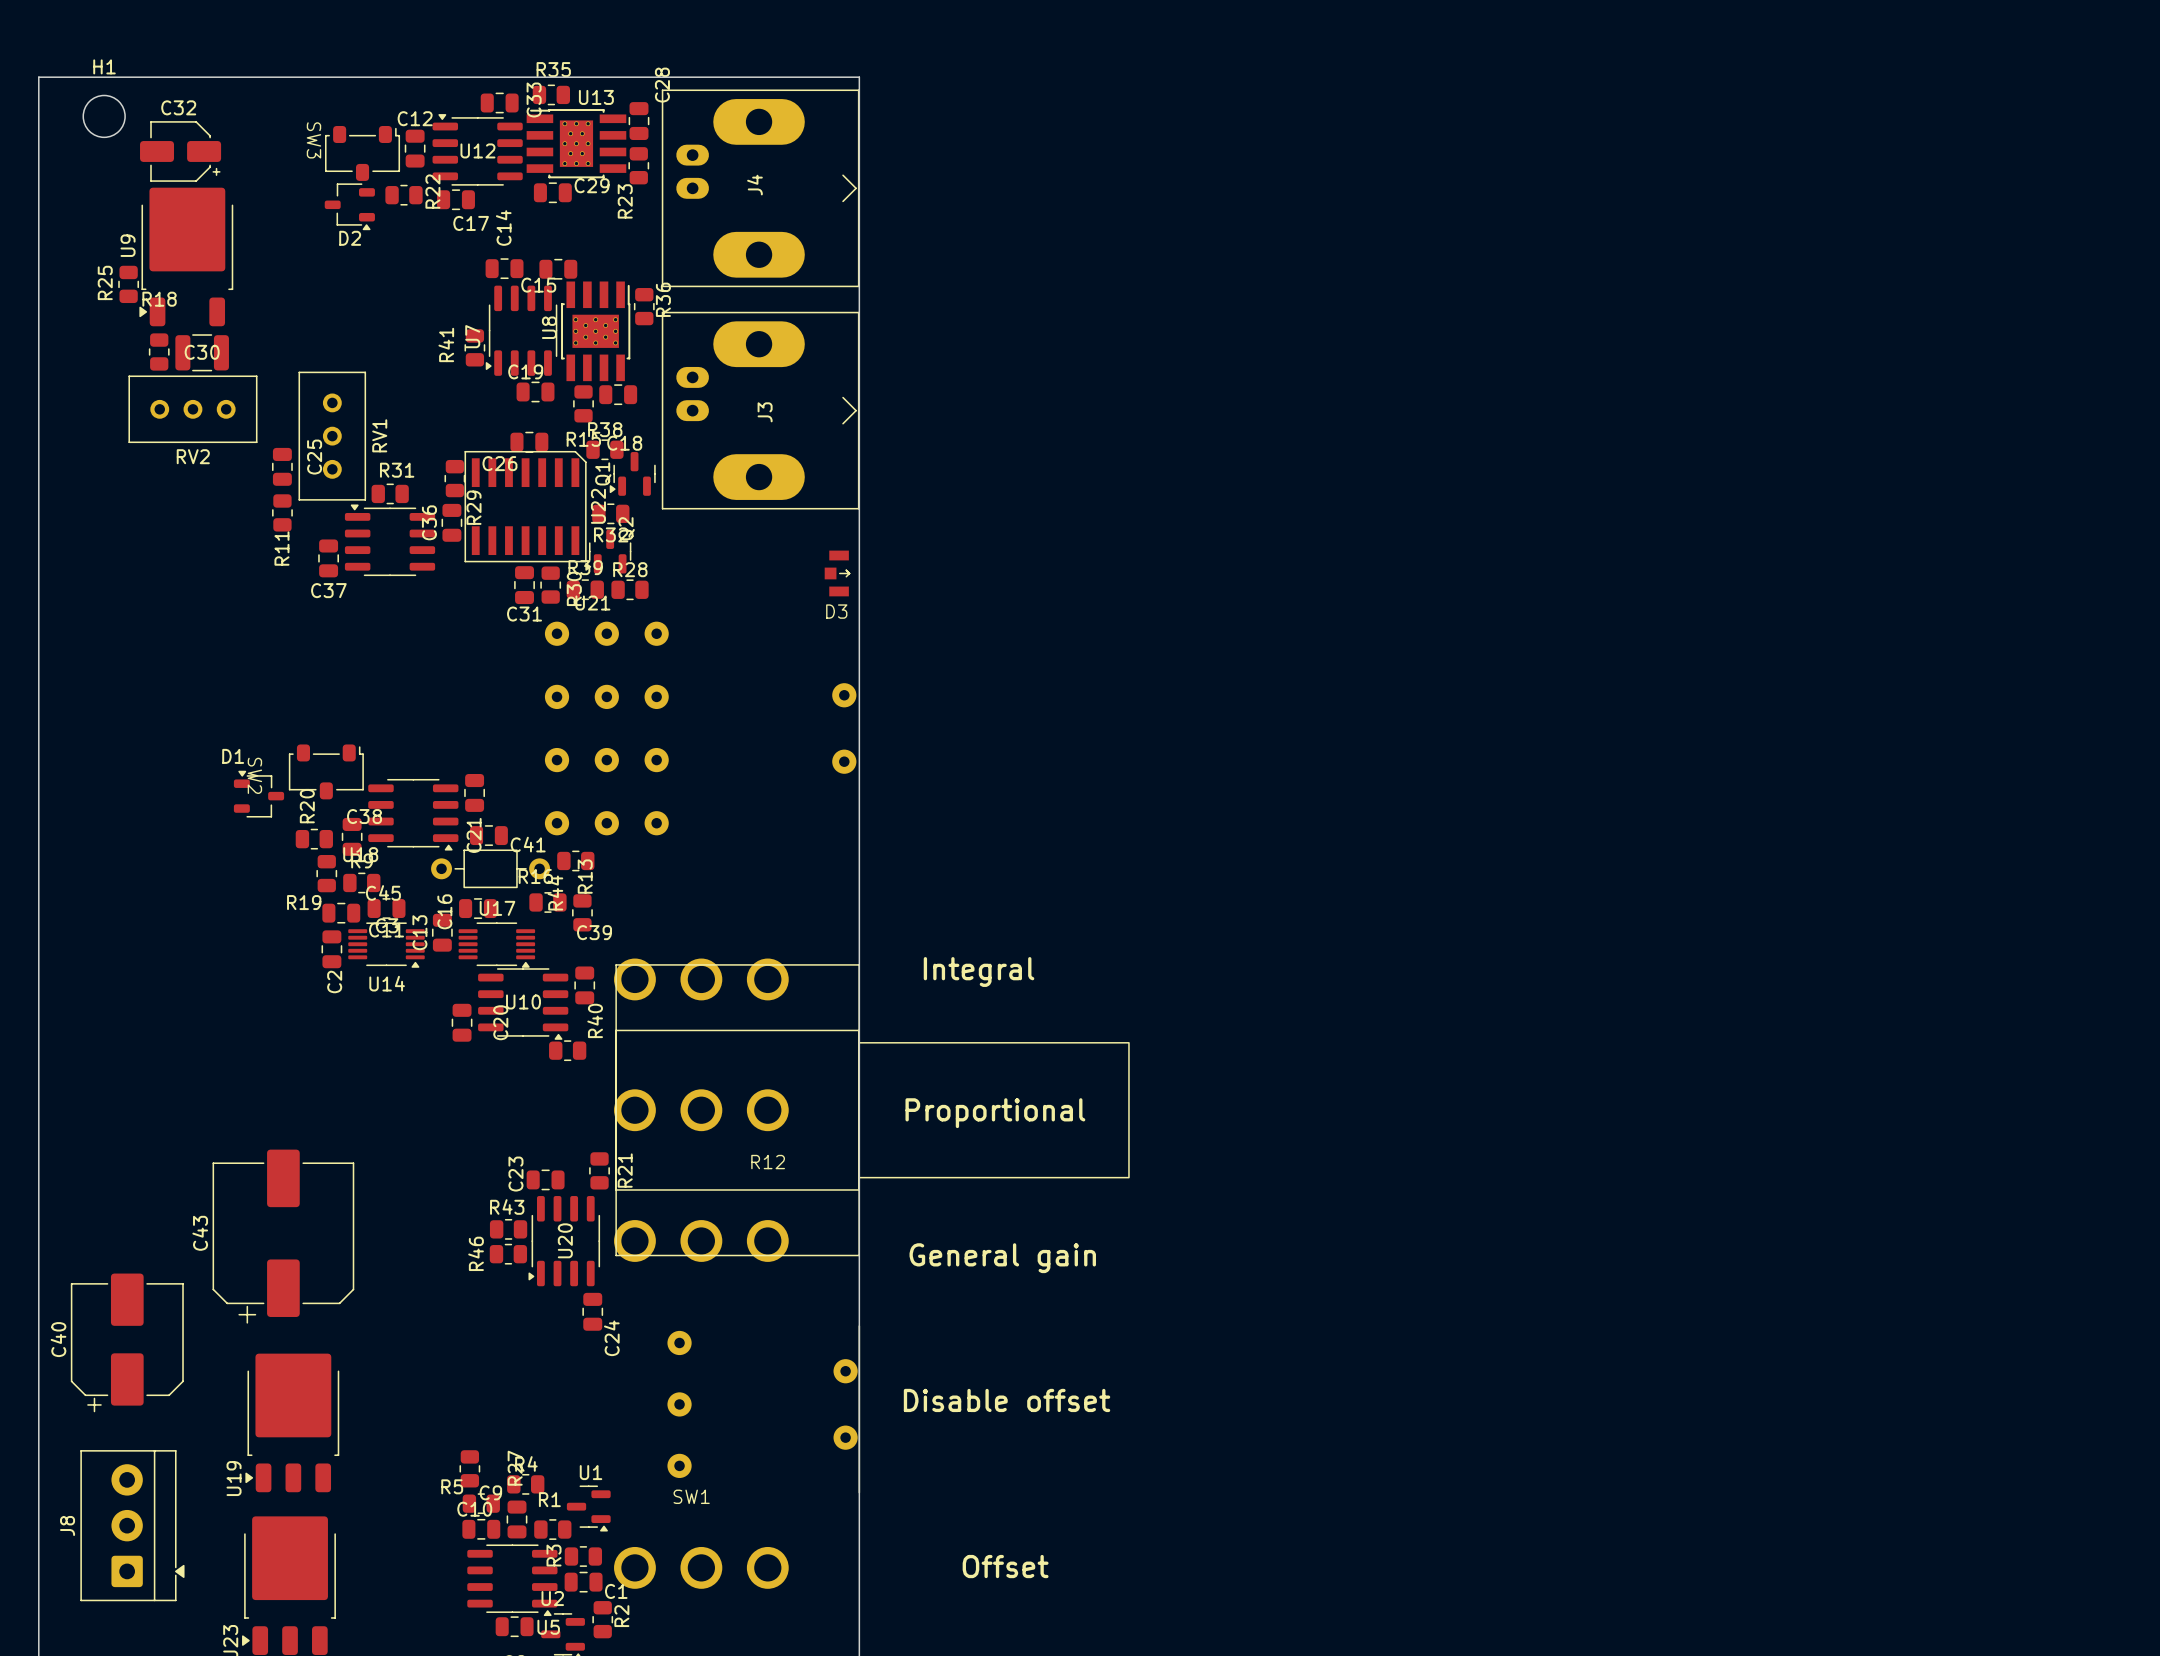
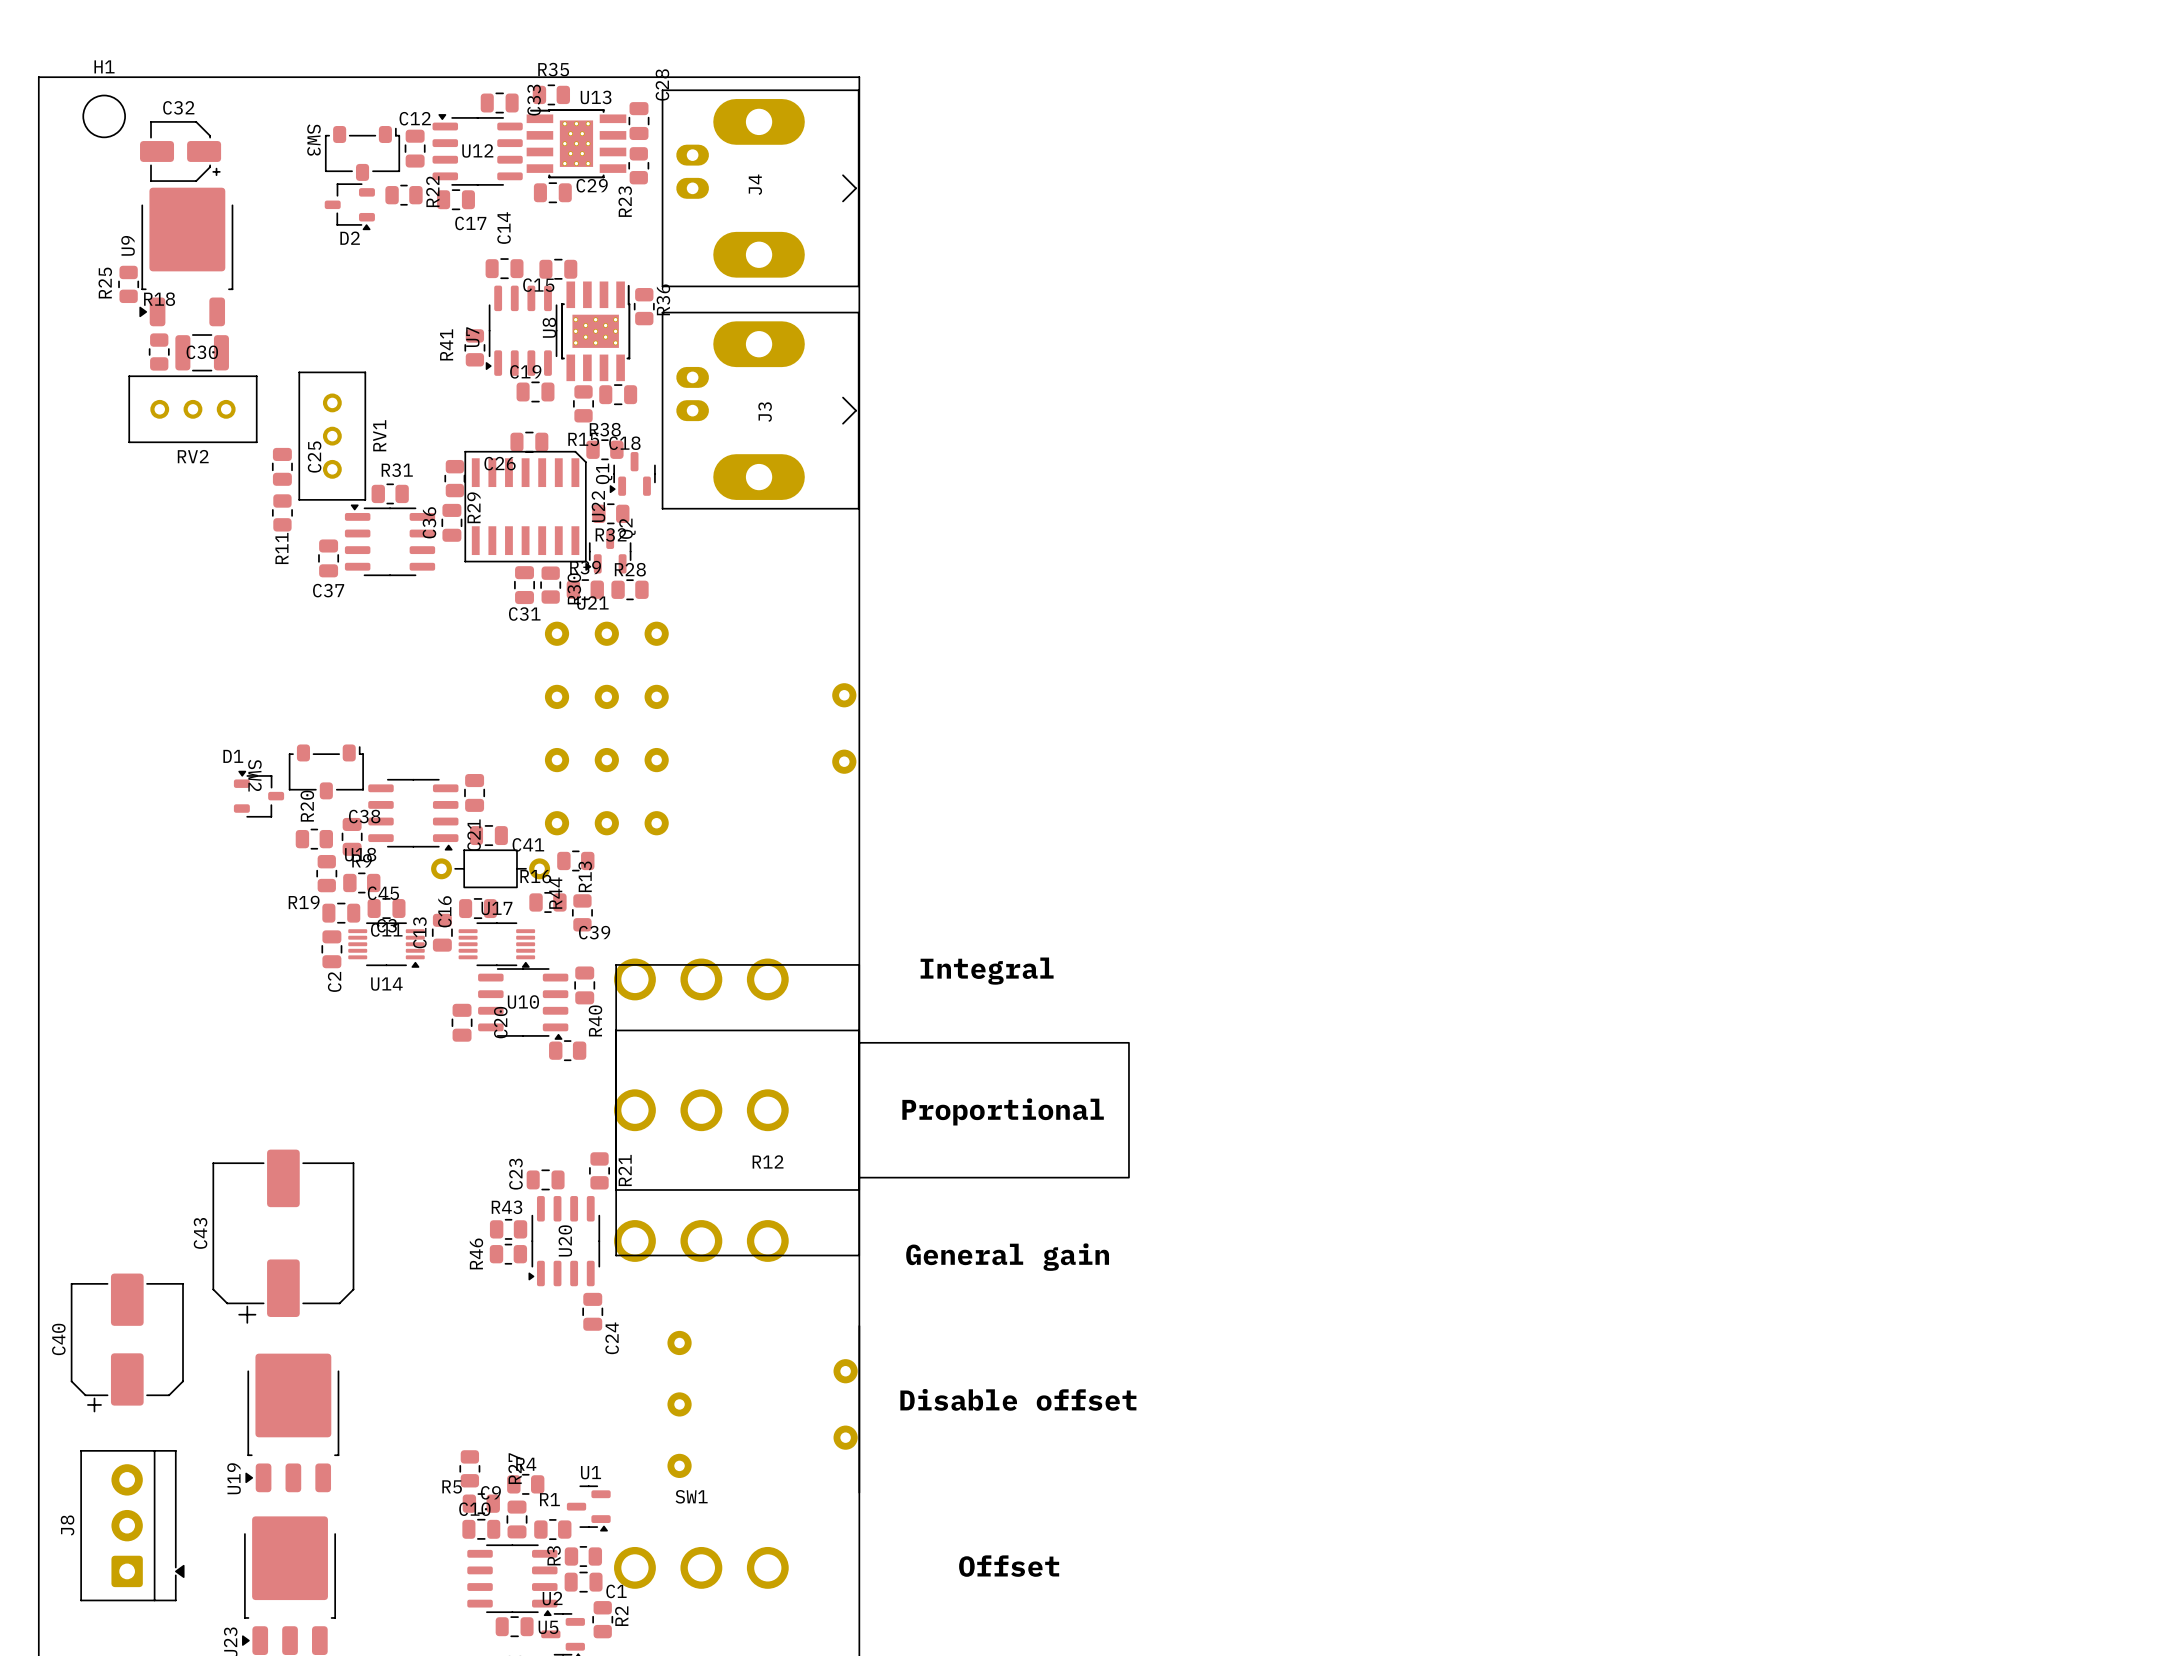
D3: (837, 573) -> none

